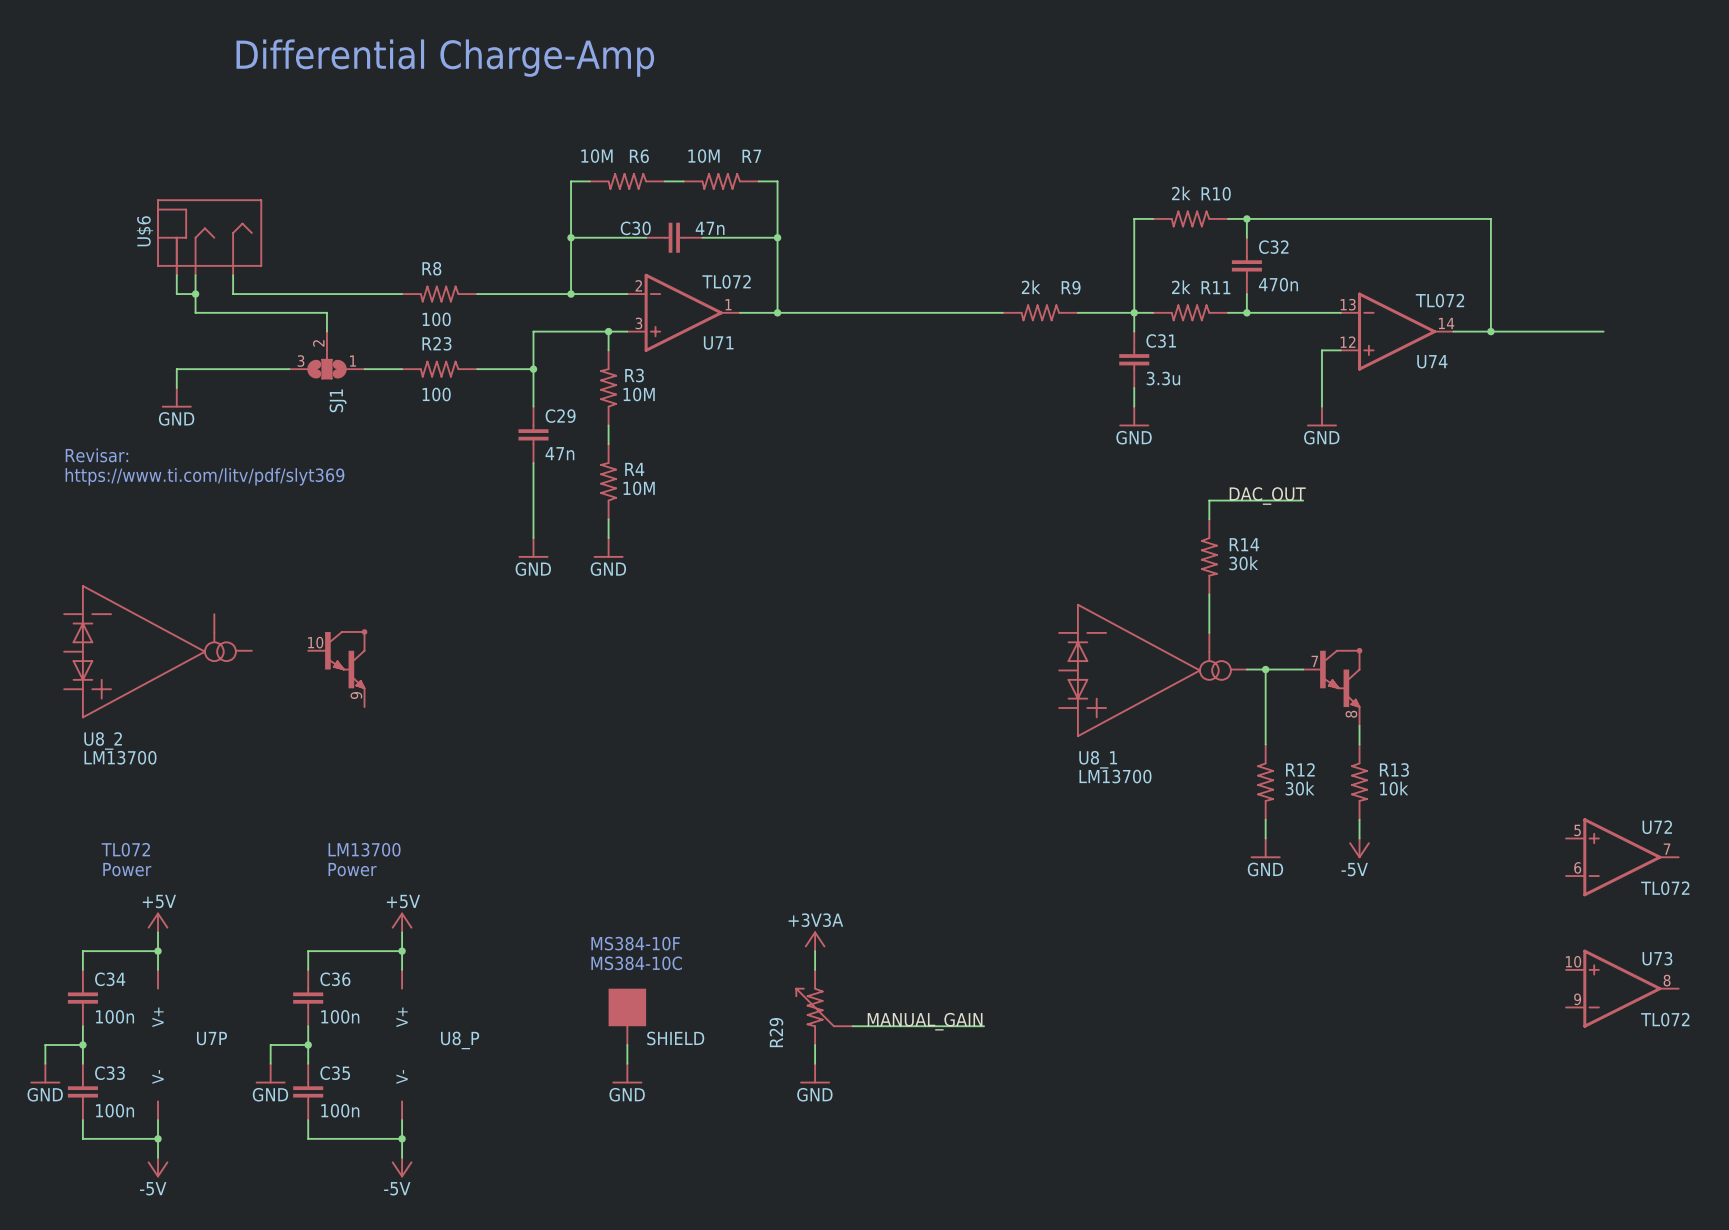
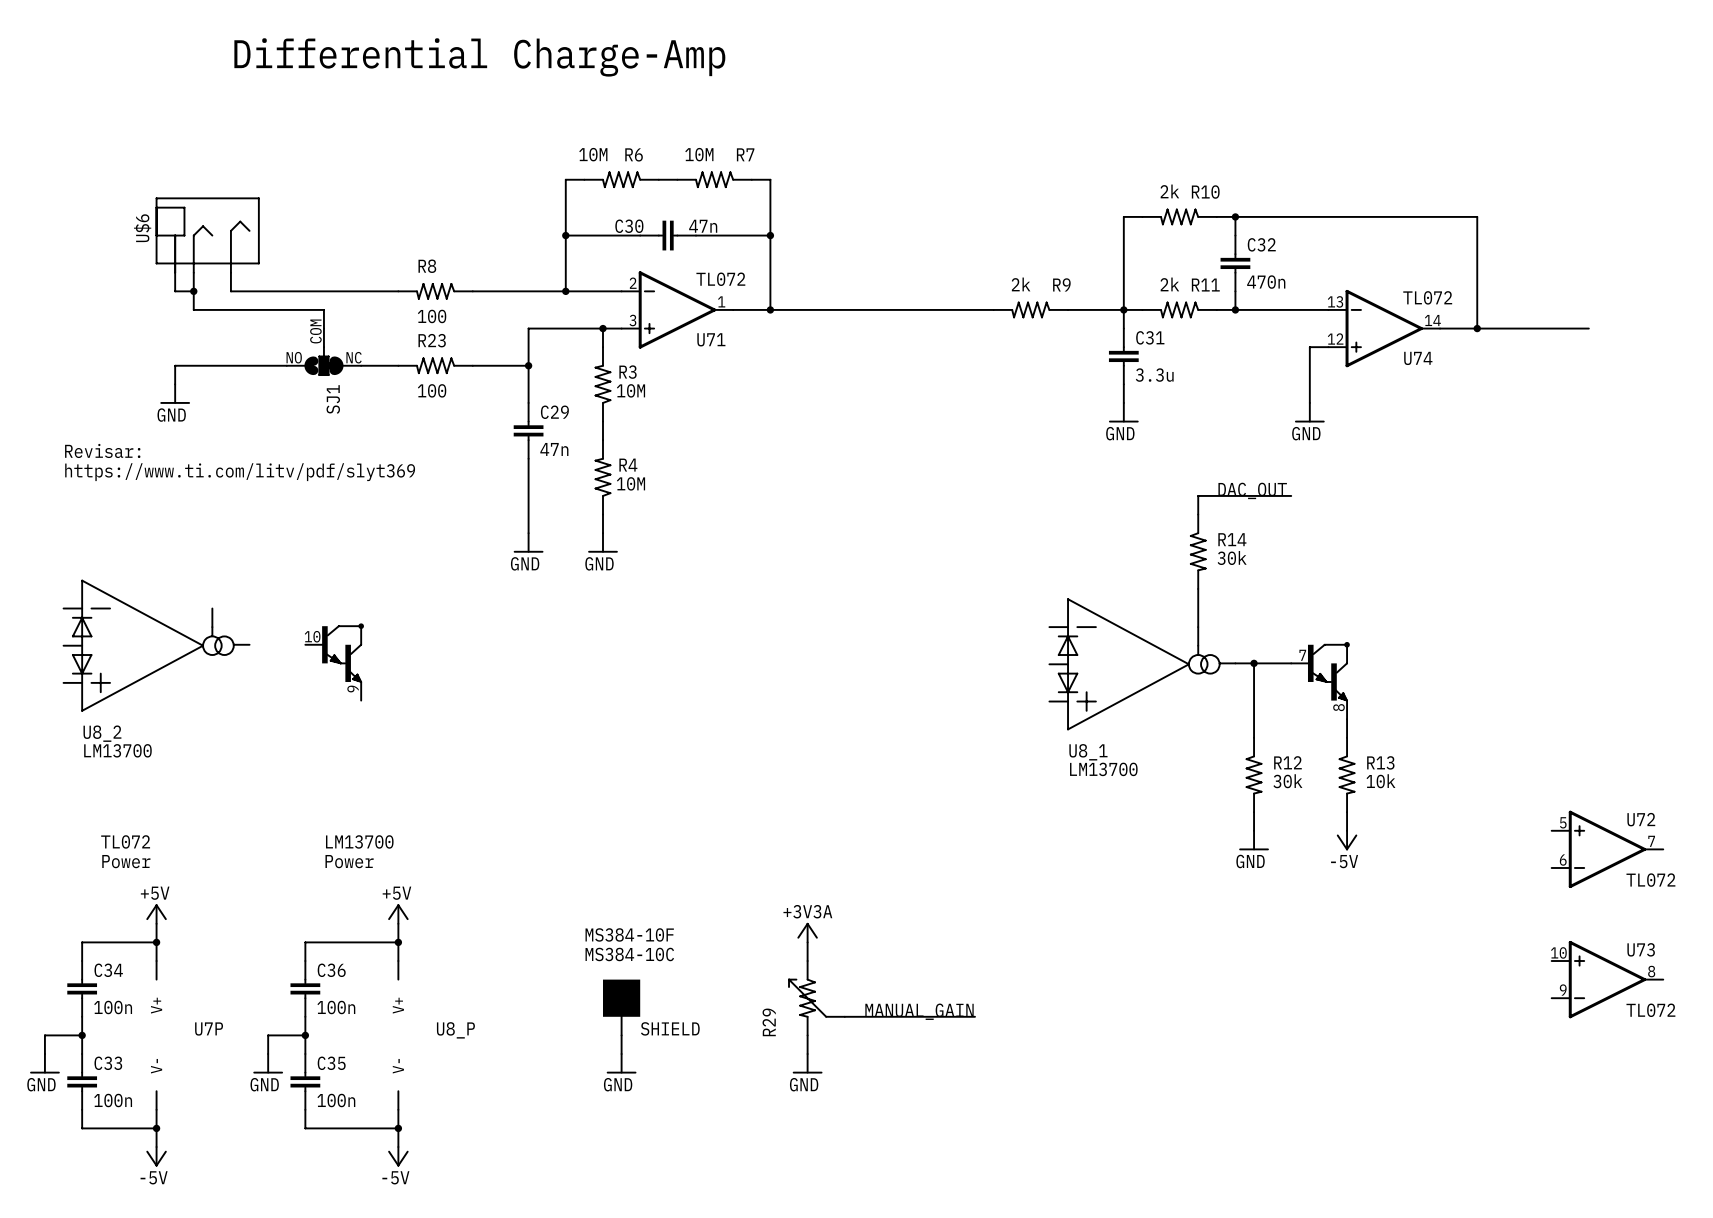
SJ1 symbol: [289, 331, 365, 380] -> [286, 328, 362, 376]

